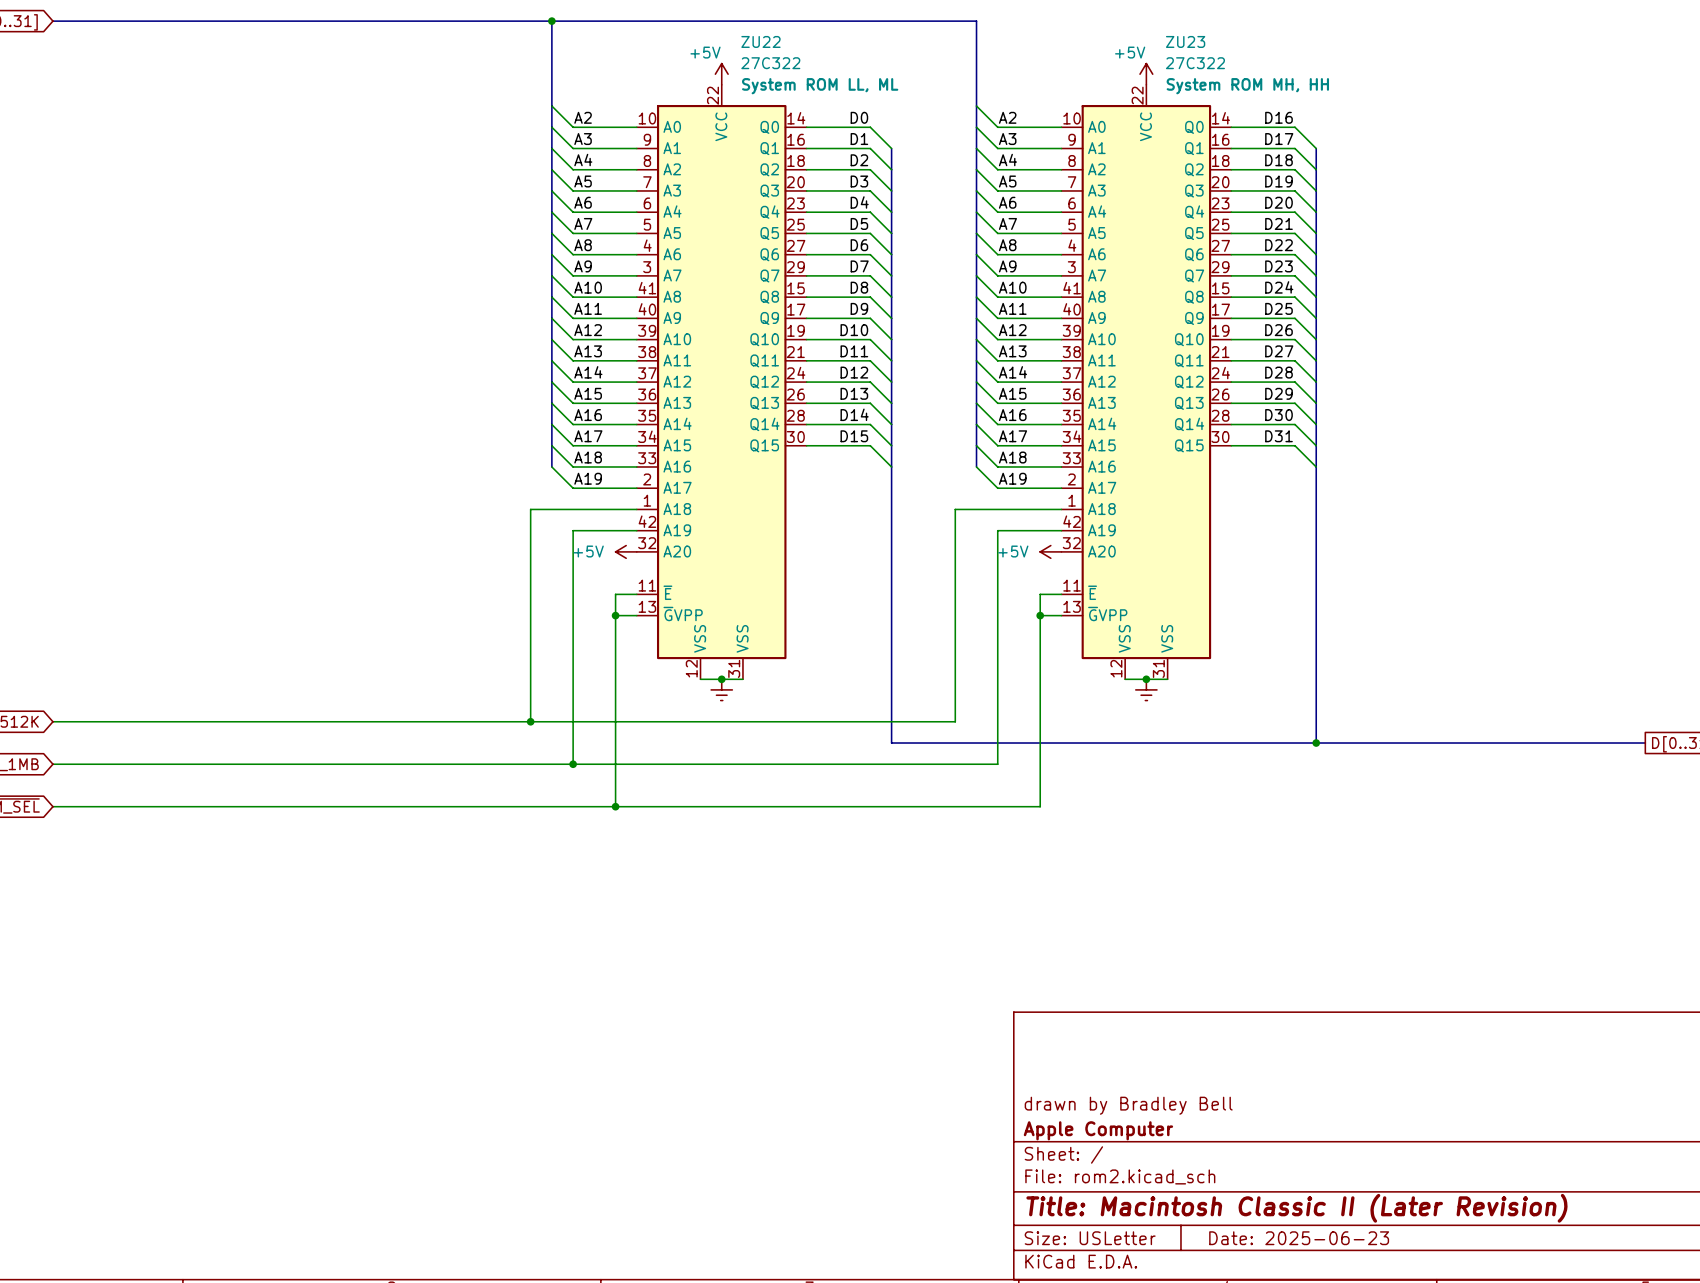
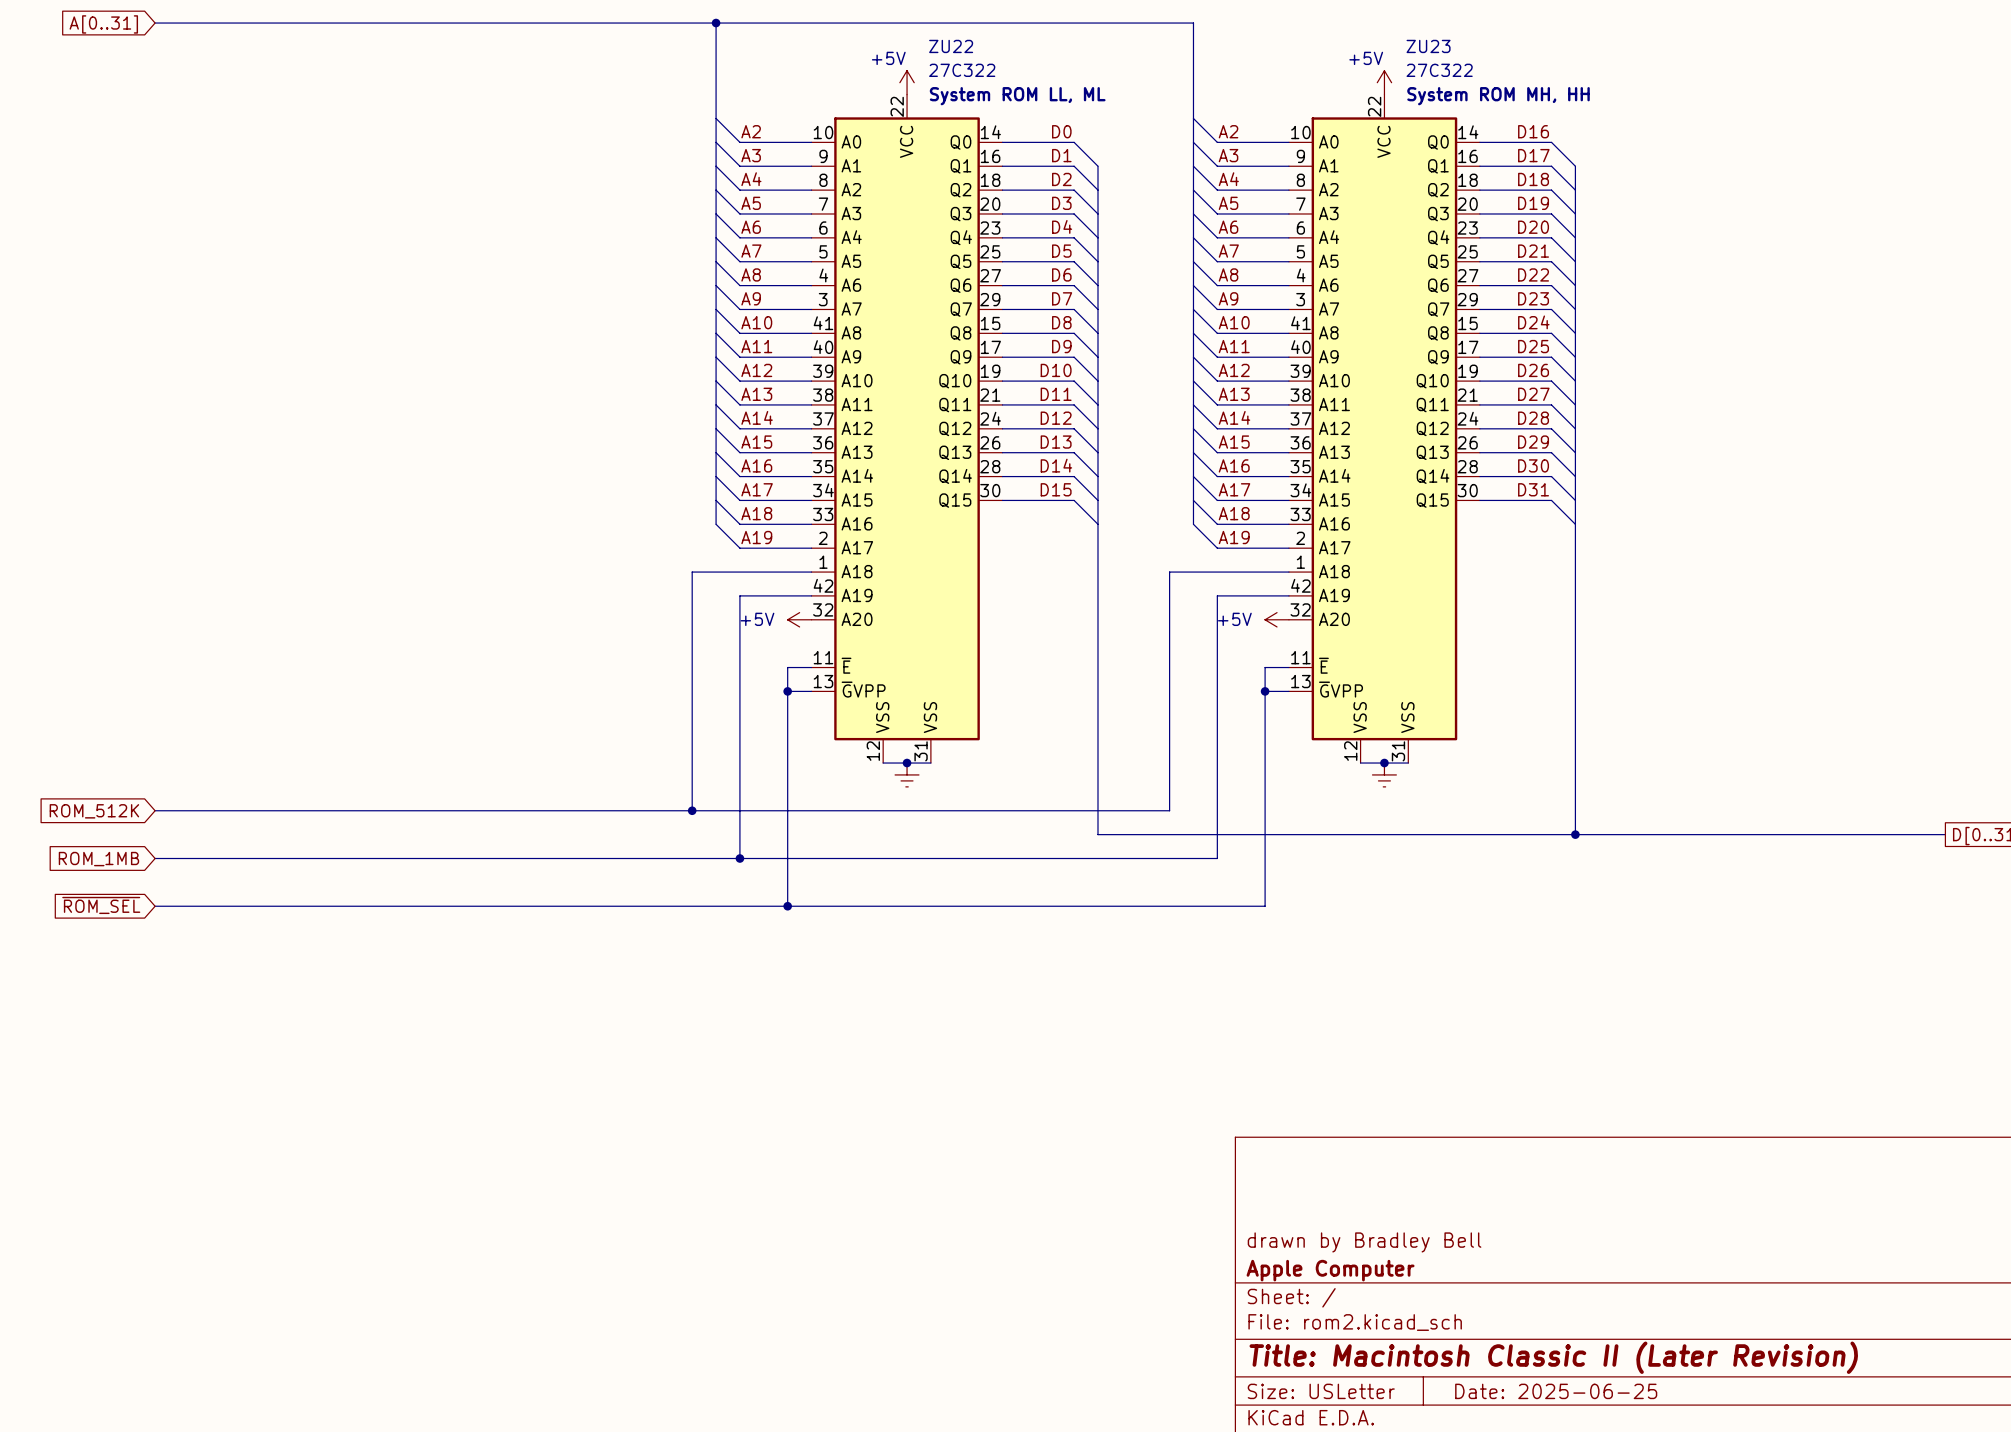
title block: Date: 2025-06-23 (1299, 1238) -> Date: 2025-06-25 (1556, 1391)

